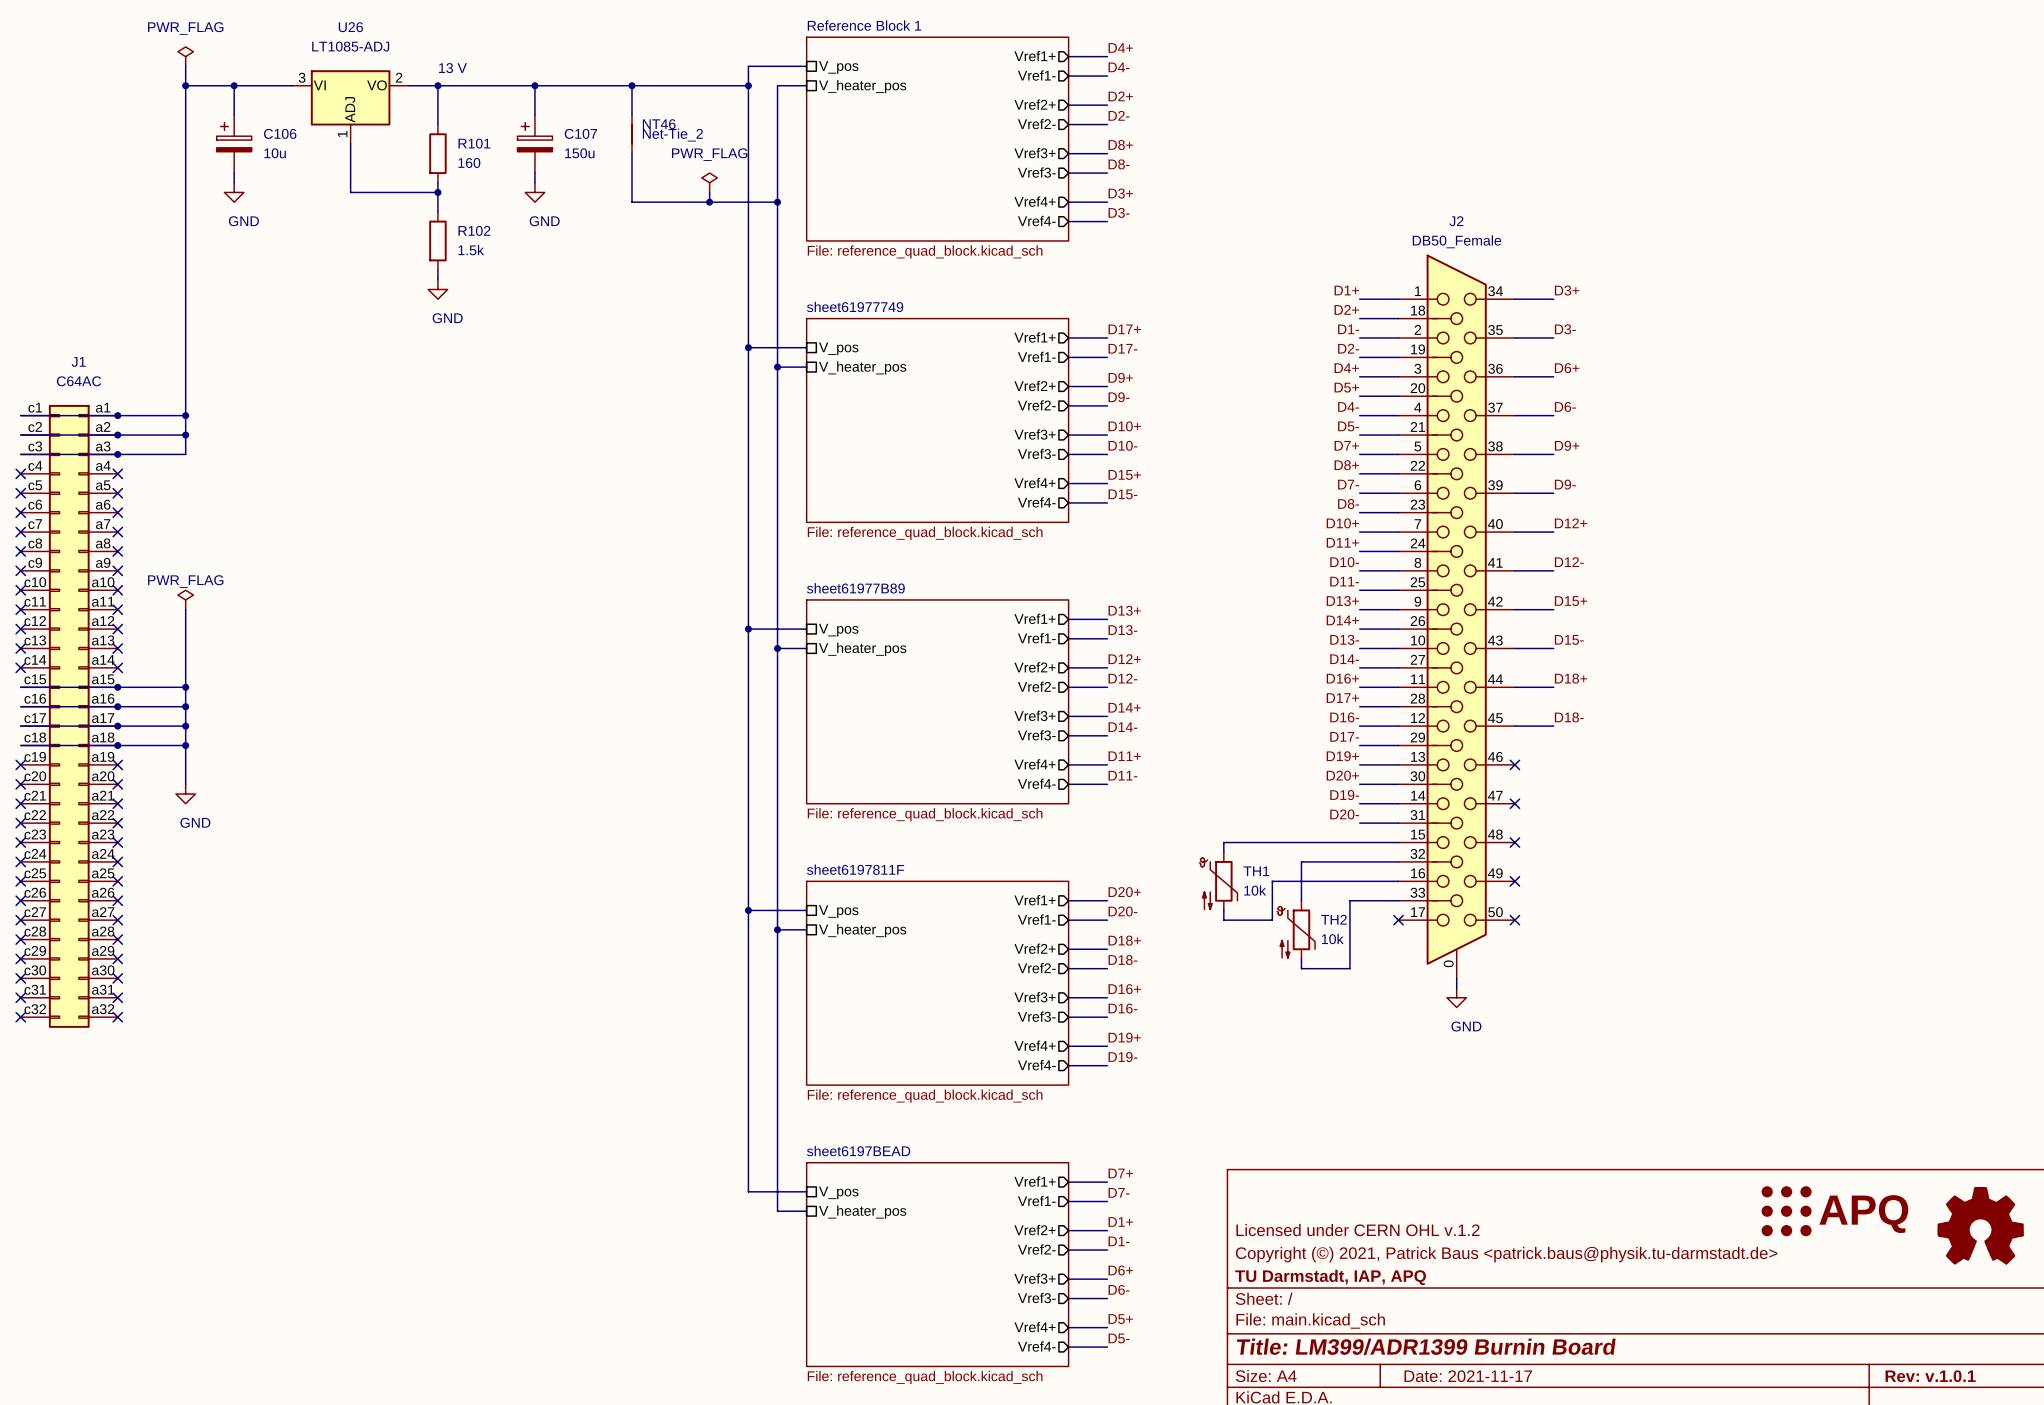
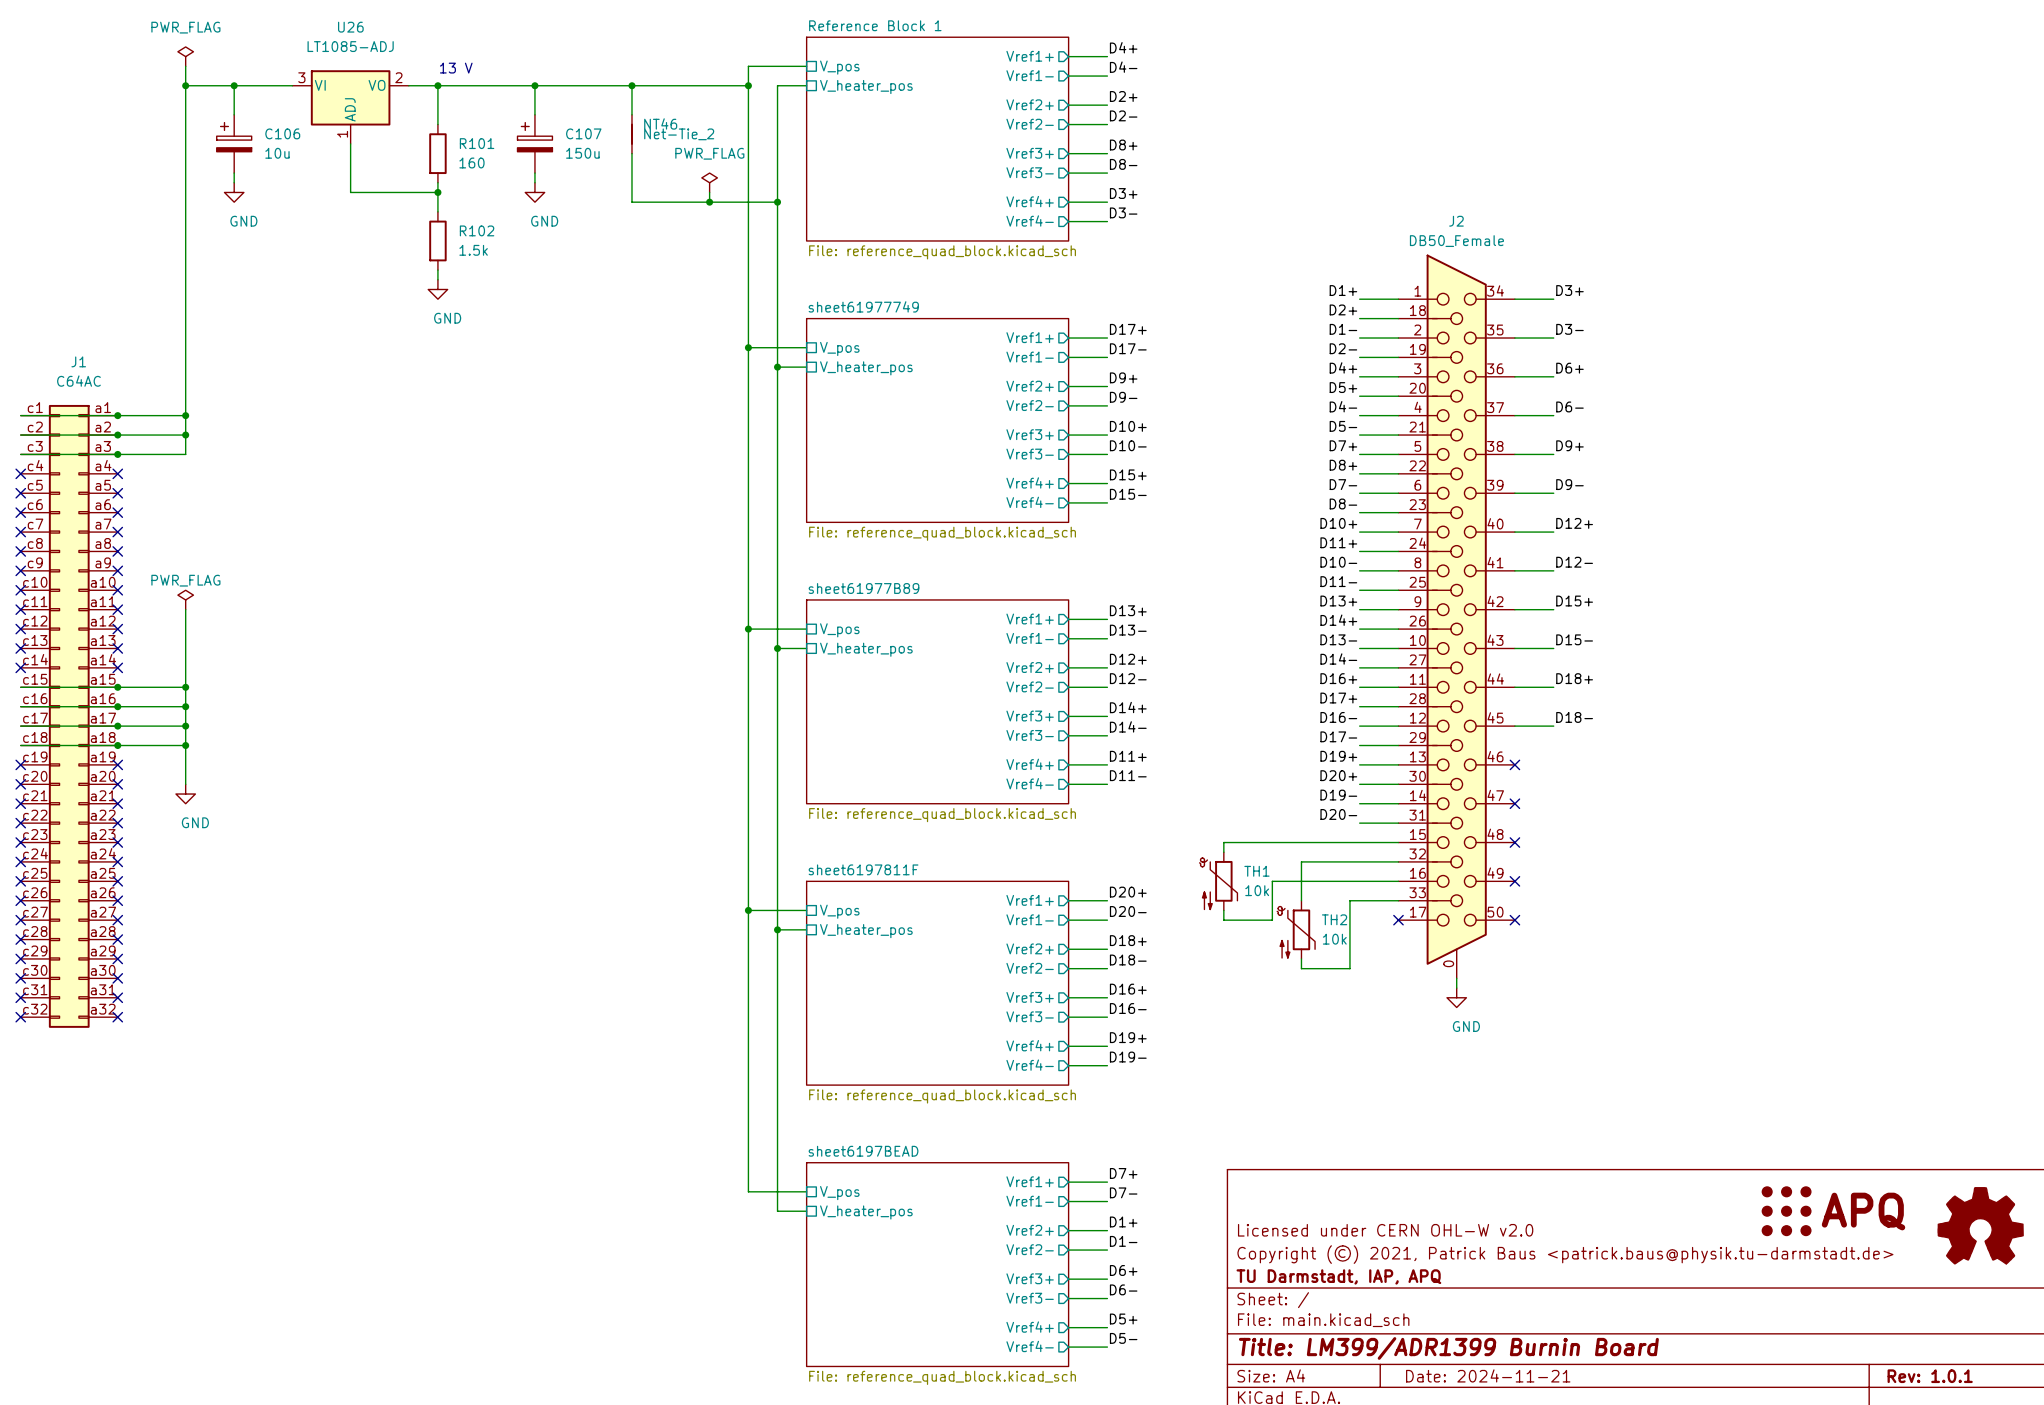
title block: Licensed under CERN OHL v.1.2 (1358, 1230) -> Licensed under CERN OHL-W v2.0 (1385, 1230)
title block: Date: 2021-11-17 (1468, 1376) -> Date: 2024-11-21 (1488, 1375)
title block: Rev: v.1.0.1 (1930, 1376) -> Rev: 1.0.1 (1930, 1376)

